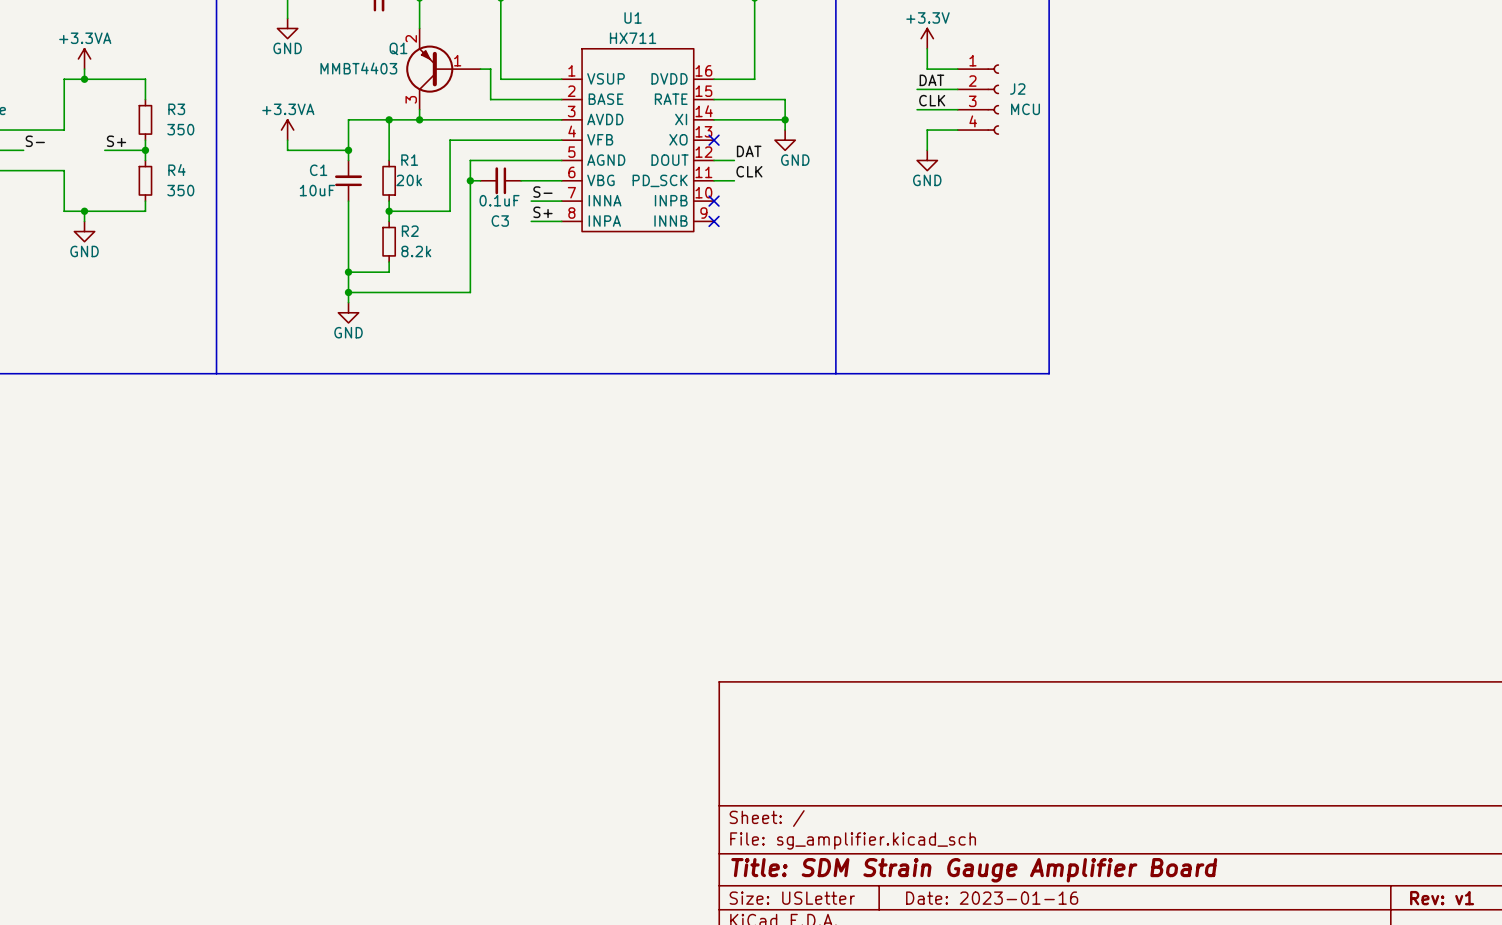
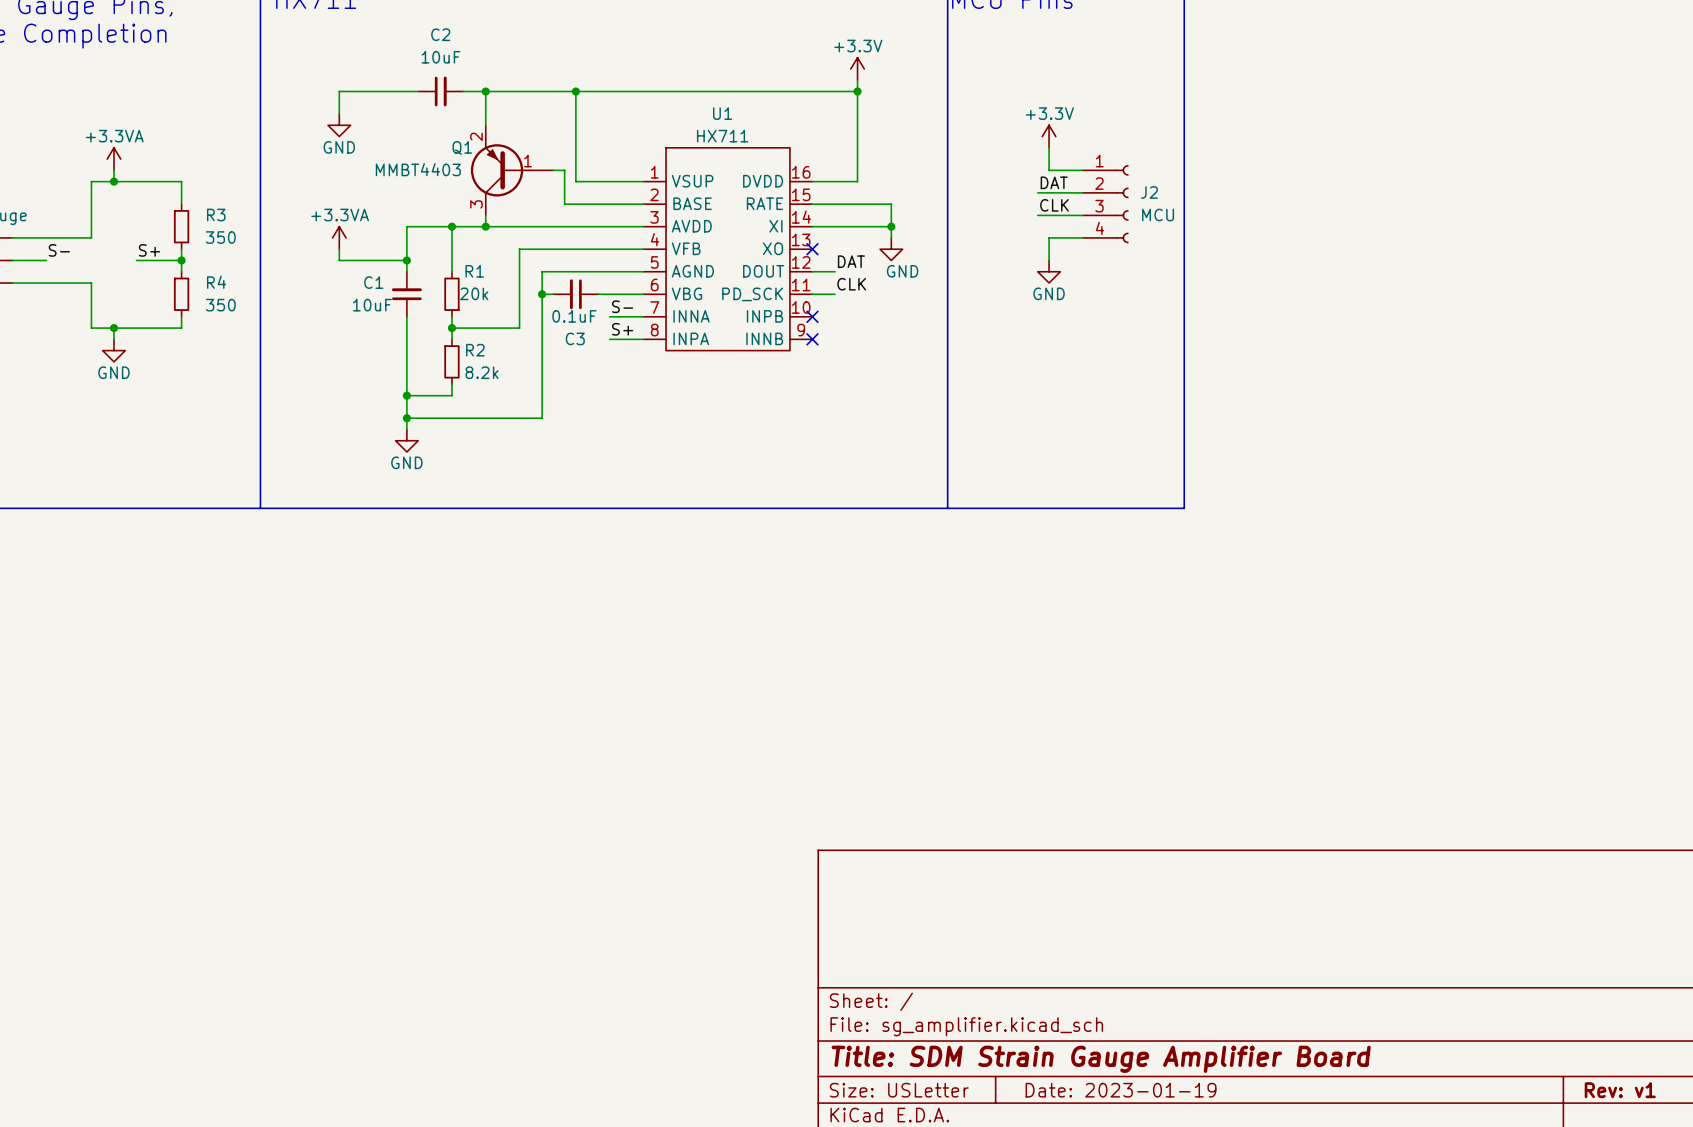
title block: Date: 2023-01-16 (992, 898) -> Date: 2023-01-19 (1121, 1090)

